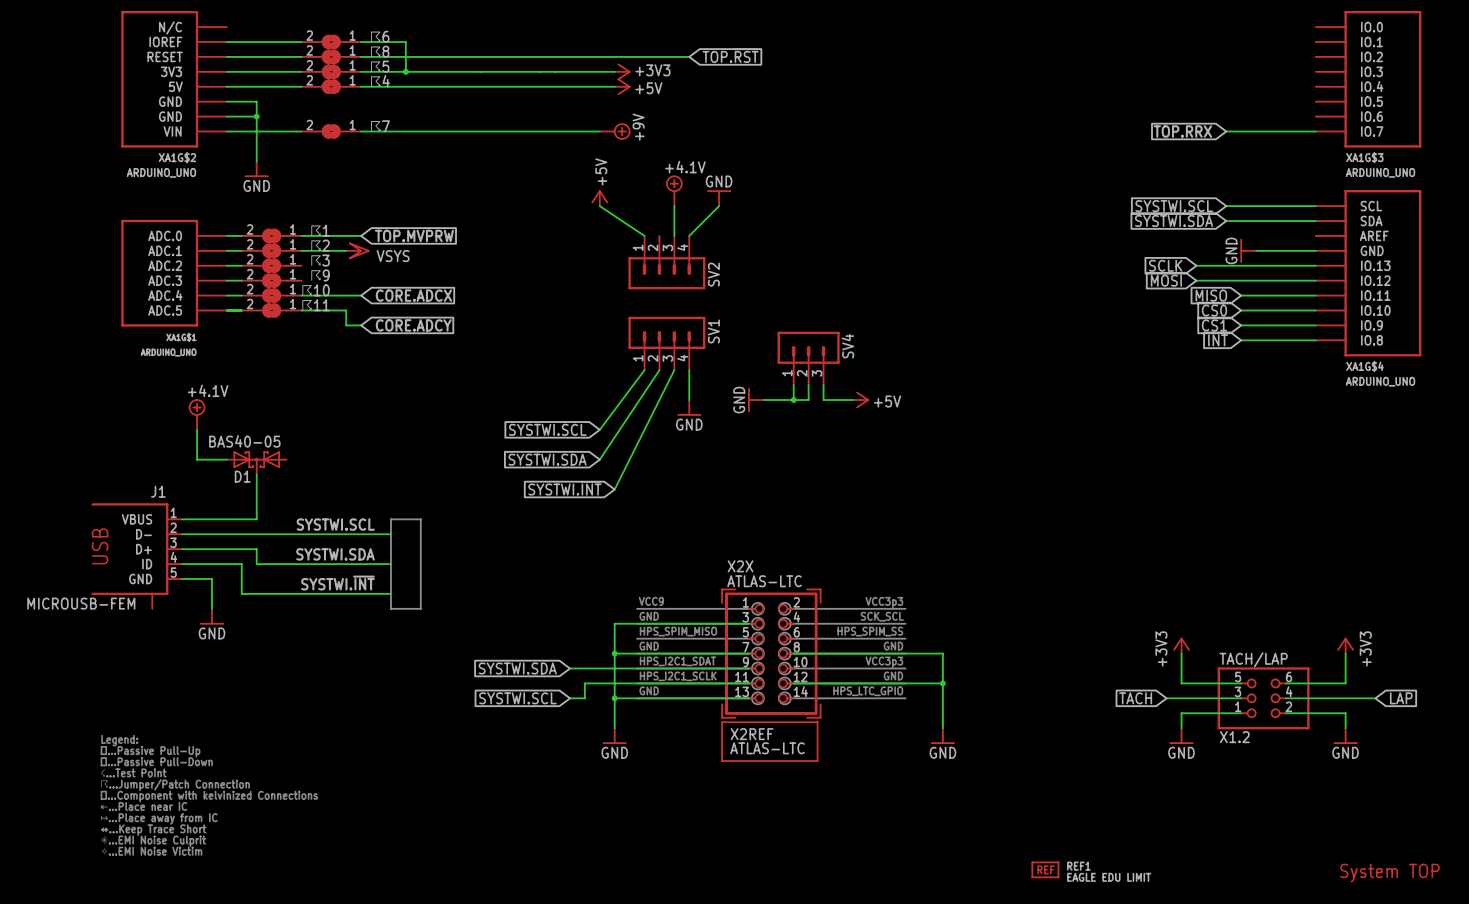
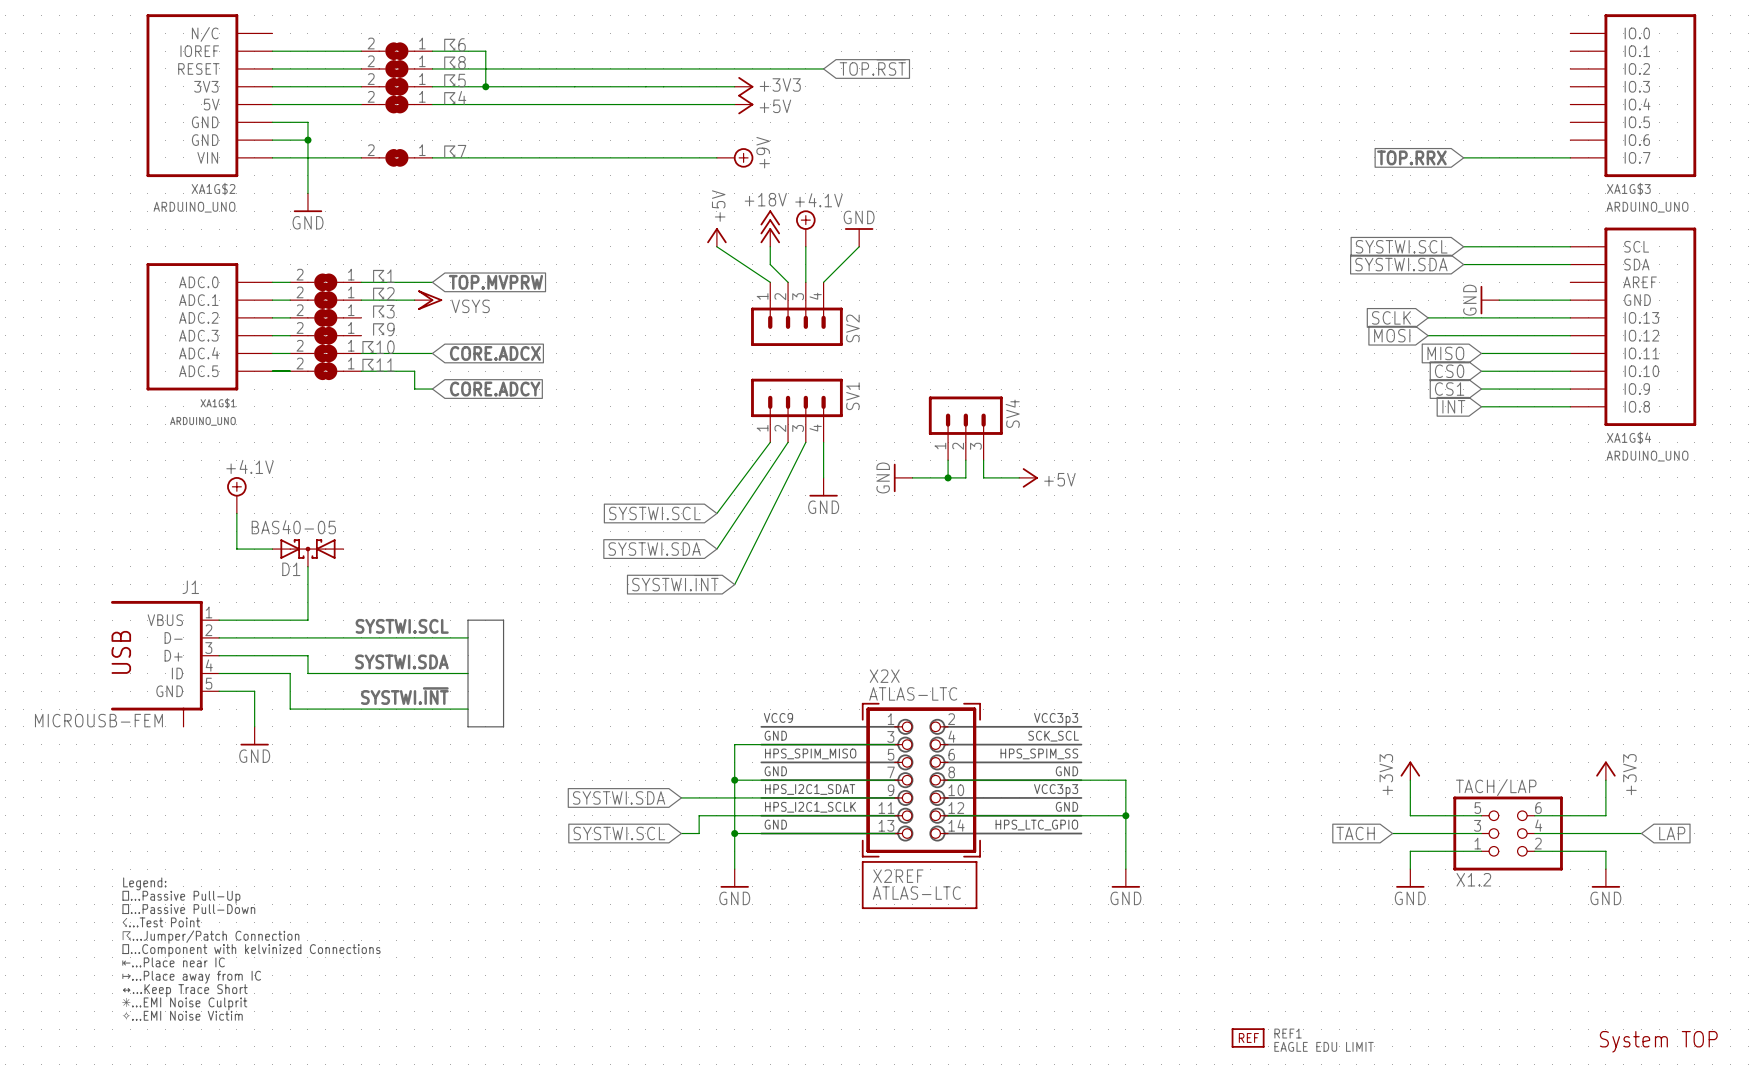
power symbol: none -> +18V (770, 228)
wire: none -> (770, 246) (770, 264) (788, 282)

